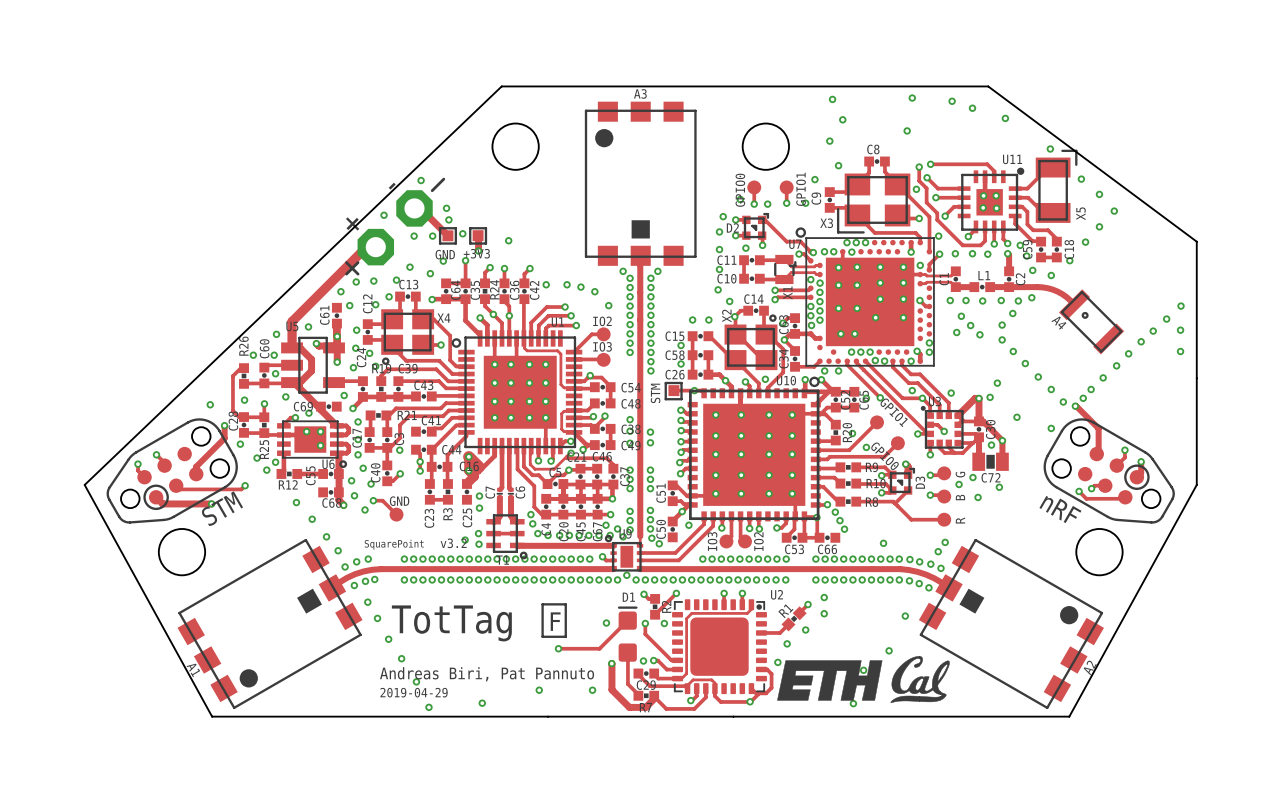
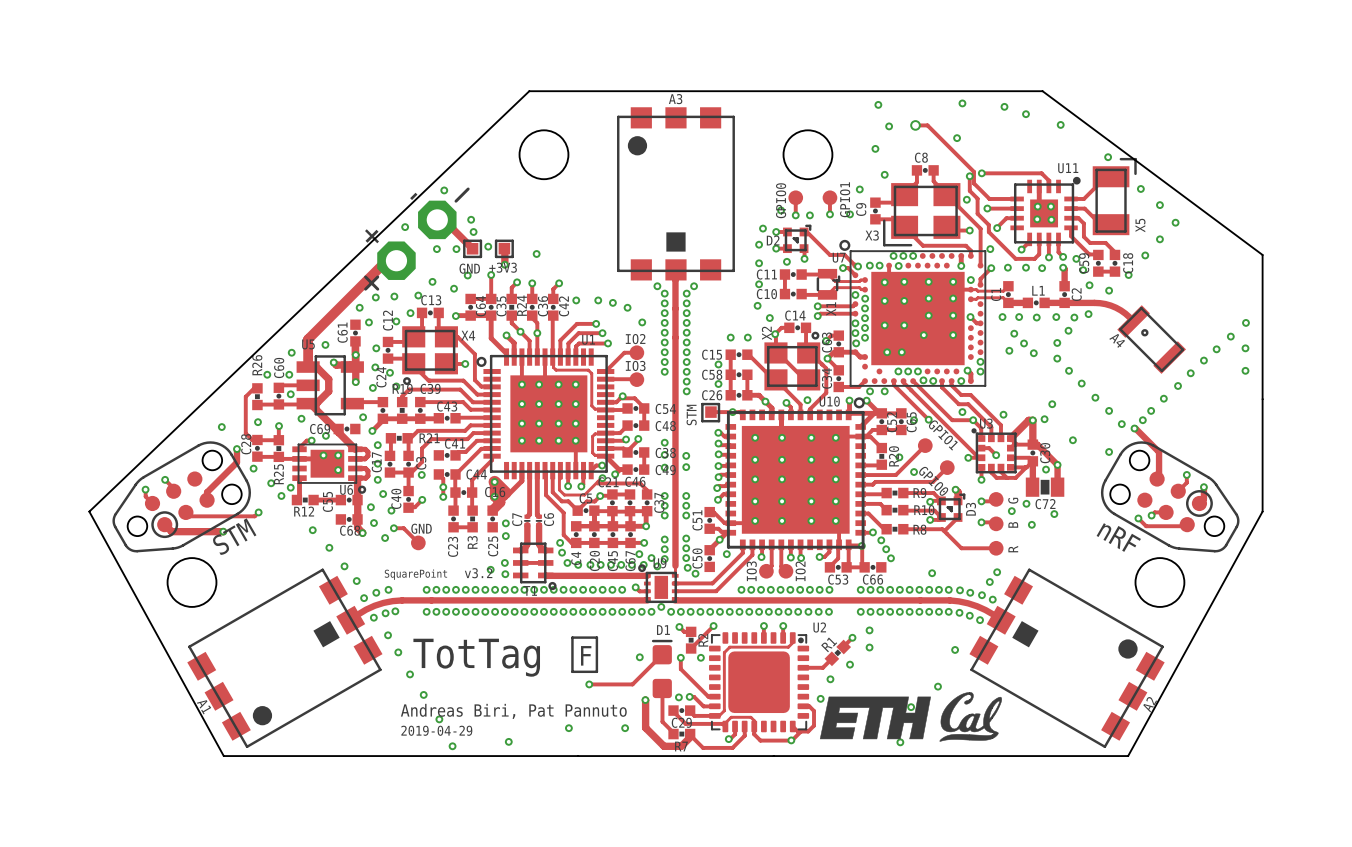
track: none -> (915, 125) (927, 125) (973, 171) (973, 183) (978, 187)
via: none -> (915, 125)
via: (927, 177) -> none

